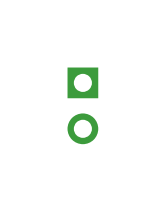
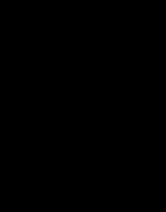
part: (82, 105) -> none

